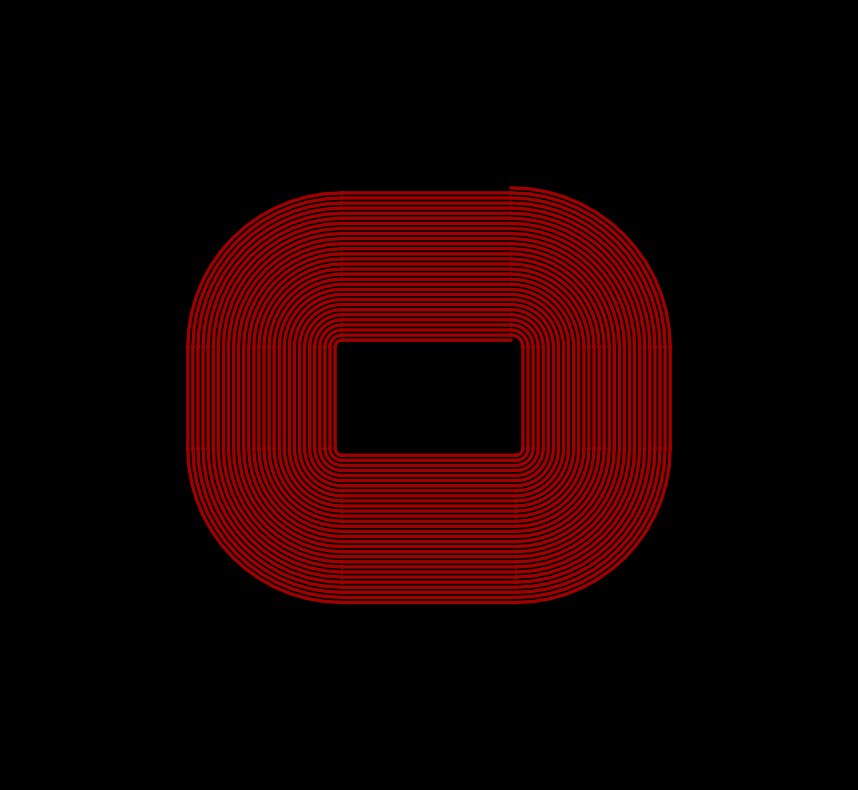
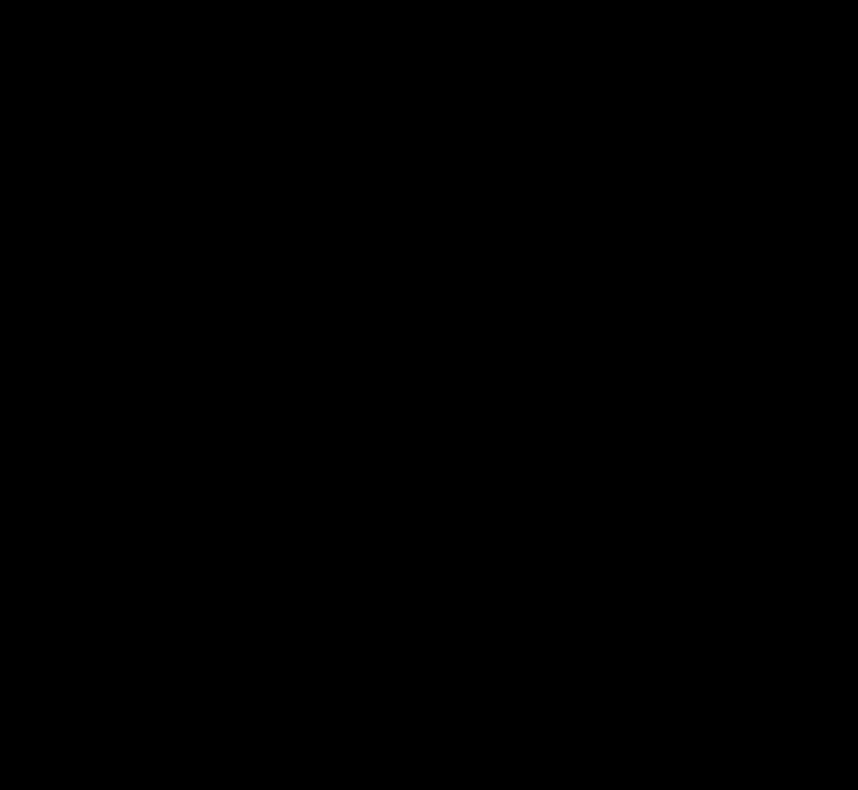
top track: (511, 187) (546, 191) (580, 203) (595, 212) (610, 222) (635, 247) (645, 262) (661, 294) (666, 311) (670, 346) (669, 465) (661, 499) (646, 530) (636, 544) (612, 568) (598, 578) (582, 587) (550, 598) (516, 602) (341, 602) (307, 598) (275, 587) (245, 568) (221, 544) (211, 530) (196, 499) (188, 465) (188, 329) (191, 312) (203, 280) (221, 250) (232, 238) (245, 226) (275, 208) (307, 196) (324, 193) (528, 193) (545, 196) (577, 208) (593, 216) (619, 238) (641, 264) (649, 280) (661, 312) (665, 346) (665, 448) (661, 481) (650, 513) (642, 527) (621, 553) (595, 574) (565, 589) (532, 596) (341, 597) (308, 593) (292, 589) (262, 574) (236, 553) (215, 527) (201, 497) (193, 465) (192, 448) (192, 346) (196, 313) (201, 297) (215, 267) (225, 254) (248, 230) (277, 212) (292, 206) (325, 198) (511, 197) (544, 201) (575, 212) (603, 230) (616, 241) (637, 267) (645, 282) (651, 297) (659, 330) (660, 448) (656, 480) (651, 495) (637, 524) (617, 550) (592, 570) (578, 578) (548, 588) (516, 592) (341, 592) (309, 588) (294, 584) (265, 570) (240, 550) (220, 524) (206, 495) (201, 480) (197, 448) (197, 346) (201, 314) (206, 299) (220, 270) (240, 245) (252, 234) (265, 225) (294, 211) (325, 203) (511, 203) (543, 206) (573, 217) (587, 225) (600, 234) (623, 257) (640, 284) (646, 299) (654, 330) (654, 448) (654, 463) (647, 494) (641, 508) (624, 534) (602, 556) (576, 573) (547, 583) (516, 587) (341, 587) (310, 583) (295, 579) (267, 565) (243, 546) (224, 522) (210, 494) (206, 479) (203, 448) (203, 346) (206, 316) (210, 301) (224, 273) (233, 260) (255, 238) (281, 221) (310, 211) (326, 209) (511, 208) (541, 211) (556, 215) (584, 229) (597, 238) (619, 260) (636, 286) (642, 301) (648, 331) (649, 448) (645, 483) (631, 515) (610, 542) (583, 564) (567, 571) (533, 581) (516, 582) (341, 582) (307, 577) (274, 564) (247, 542) (226, 515) (212, 483) (208, 448) (209, 329) (212, 312) (226, 280) (247, 252) (260, 240) (290, 223) (324, 214) (511, 213) (540, 216) (569, 226) (582, 233) (605, 252) (615, 263) (624, 275) (637, 302) (643, 331) (644, 448) (640, 481) (634, 497) (618, 526) (594, 550) (565, 567) (532, 575) (516, 577) (341, 577) (308, 572) (277, 559) (250, 539) (230, 512) (217, 481) (213, 448) (214, 330) (223, 297) (230, 282) (250, 255) (263, 244) (292, 228) (325, 219) (511, 218) (539, 221) (553, 225) (579, 238) (602, 255) (611, 266) (626, 291) (636, 318) (638, 332) (639, 448) (635, 480) (623, 510) (603, 535) (591, 546) (563, 562) (548, 567) (516, 572) (341, 572) (309, 567) (280, 555) (254, 535) (234, 510) (222, 480) (218, 448) (219, 330) (227, 299) (234, 285) (243, 271) (266, 248) (294, 232) (325, 224) (511, 223) (538, 226) (551, 230) (576, 242) (598, 259) (607, 269) (615, 281) (627, 306) (633, 333) (634, 448) (630, 479) (618, 507) (599, 532) (588, 542) (561, 557) (546, 562) (516, 566) (341, 566) (311, 562) (282, 551) (258, 532) (239, 507) (227, 479) (223, 448) (224, 331) (227, 316) (239, 287) (258, 263) (269, 252) (296, 237) (326, 229) (511, 228) (537, 231) (562, 240) (594, 263) (617, 295) (628, 333) (629, 448) (625, 477) (620, 491) (606, 517) (585, 538) (559, 553) (545, 557) (516, 561) (341, 561) (312, 557) (285, 546) (261, 528) (243, 505) (232, 477) (228, 448) (229, 332) (237, 303) (243, 290) (251, 277) (272, 256) (298, 242) (327, 234) (525, 234) (540, 237) (567, 248) (591, 266) (609, 290) (620, 317) (623, 332) (624, 448) (620, 476) (609, 502) (602, 514) (582, 534) (570, 542) (544, 553) (516, 556) (327, 555) (300, 548) (275, 534) (255, 514) (248, 502) (237, 476) (233, 448) (234, 332) (237, 318) (248, 292) (255, 280) (275, 260) (300, 246) (327, 239) (511, 238) (535, 241) (568, 255) (587, 270) (608, 299) (618, 334) (619, 448) (615, 475) (611, 487) (598, 511) (589, 521) (567, 537) (542, 548) (516, 551) (328, 550) (315, 548) (290, 537) (268, 521) (252, 500) (242, 475) (238, 448) (239, 333) (242, 320) (252, 295) (268, 273) (278, 265) (302, 251) (328, 244) (511, 243) (534, 246) (565, 259) (591, 282) (604, 302) (613, 335) (614, 448) (610, 473) (601, 497) (594, 508) (585, 517) (565, 533) (541, 543) (516, 546) (329, 545) (304, 539) (282, 526) (263, 508) (251, 486) (247, 473) (243, 448) (244, 334) (247, 321) (256, 297) (272, 277) (282, 269) (304, 256) (329, 249) (511, 248) (532, 251) (563, 263) (587, 285) (603, 314) (608, 335) (609, 448) (606, 472) (596, 494) (589, 505) (581, 514) (562, 529) (540, 538) (516, 541) (329, 540) (306, 534) (285, 522) (276, 514) (261, 494) (251, 472) (248, 448) (249, 334) (255, 311) (261, 300) (276, 281) (285, 273) (306, 260) (329, 254) (521, 254) (551, 263) (576, 281) (594, 306) (603, 336) (604, 448) (601, 471) (597, 482) (585, 502) (578, 510) (560, 524) (538, 533) (516, 536) (330, 535) (308, 529) (288, 518) (272, 502) (260, 482) (256, 471) (253, 448) (254, 335) (260, 313) (265, 302) (272, 293) (288, 277) (308, 265) (330, 259) (522, 259) (544, 265) (564, 277) (573, 284) (587, 302) (596, 324) (598, 335) (599, 448) (596, 469) (581, 498) (557, 520) (537, 528) (516, 531) (331, 530) (310, 525) (291, 514) (276, 498) (261, 469) (258, 448) (259, 336) (270, 305) (291, 281) (310, 270) (331, 264) (520, 264) (547, 272) (569, 288) (585, 310) (593, 337) (594, 448) (591, 468) (577, 495) (555, 515) (536, 523) (516, 526) (331, 525) (312, 520) (294, 510) (274, 487) (266, 468) (263, 448) (264, 336) (274, 307) (294, 285) (312, 274) (331, 269) (519, 269) (544, 276) (566, 291) (581, 313) (588, 338) (588, 448) (586, 467) (573, 492) (552, 511) (534, 518) (516, 521) (332, 520) (313, 515) (290, 499) (278, 484) (271, 467) (269, 448) (269, 337) (278, 310) (297, 289) (313, 279) (332, 274) (519, 274) (542, 281) (562, 295) (576, 315) (583, 338) (583, 457) (578, 474) (569, 489) (549, 507) (533, 513) (516, 516) (332, 515) (315, 510) (300, 502) (283, 482) (276, 465) (274, 448) (274, 338) (283, 313) (300, 293) (315, 284) (341, 279) (518, 279) (540, 285) (558, 299) (572, 317) (578, 339) (578, 456) (570, 479) (560, 492) (547, 502) (532, 508) (516, 511) (333, 510) (310, 502) (297, 492) (287, 479) (281, 464) (279, 448) (279, 338) (287, 315) (303, 297) (325, 286) (341, 284) (519, 284) (535, 289) (555, 302) (568, 322) (573, 338) (573, 455) (565, 477) (556, 489) (544, 498) (531, 504) (516, 505) (334, 505) (319, 501) (306, 494) (292, 477) (286, 463) (284, 448) (284, 339) (292, 318) (306, 301) (319, 293) (341, 289) (517, 289) (536, 295) (551, 306) (562, 321) (568, 340) (568, 455) (564, 468) (557, 480) (542, 493) (529, 499) (516, 500) (334, 500) (321, 496) (309, 490) (296, 474) (291, 462) (289, 448) (289, 340) (296, 320) (309, 305) (321, 298) (341, 294) (516, 294) (533, 299) (548, 309) (558, 324) (563, 341) (563, 453) (556, 473) (541, 488) (526, 494) (516, 495) (335, 495) (323, 492) (312, 486) (304, 477) (296, 460) (294, 341) (299, 326) (312, 309) (326, 302) (341, 299) (516, 299) (531, 304) (544, 313) (553, 326) (558, 341) (558, 453) (551, 470) (538, 484) (530, 488) (516, 490) (336, 490) (320, 485) (311, 478) (305, 469) (299, 453) (299, 342) (306, 324) (319, 311) (332, 305) (341, 304) (515, 304) (529, 308) (540, 316) (549, 328) (553, 342) (553, 452) (547, 468) (532, 482) (516, 485) (336, 485) (327, 482) (315, 474) (307, 462) (304, 453) (304, 342) (309, 328) (319, 317) (332, 310) (341, 309) (515, 309) (529, 314) (537, 320) (545, 332) (547, 342) (548, 452) (541, 468) (532, 476) (516, 480) (337, 480) (325, 476) (319, 471) (312, 460) (309, 452) (309, 343) (314, 329) (324, 319) (341, 314) (514, 314) (525, 317) (533, 324) (540, 332) (543, 343) (543, 451) (539, 462) (530, 471) (516, 475) (338, 475) (322, 467) (314, 451) (314, 343) (318, 332) (327, 323) (341, 319) (514, 320) (522, 322) (530, 327) (535, 335) (537, 343) (538, 450) (534, 460) (527, 467) (516, 470) (338, 470) (326, 464) (320, 451) (319, 344) (323, 335) (330, 328) (341, 324) (511, 324) (524, 329) (530, 337) (532, 344) (532, 450) (530, 457) (525, 462) (516, 465) (341, 465) (329, 460) (325, 450) (325, 345) (327, 337) (332, 332) (341, 329) (511, 329) (523, 334) (527, 345) (527, 448) (522, 458) (516, 460) (341, 460) (333, 456) (330, 450) (329, 346) (331, 340) (335, 336) (341, 335) (511, 335) (519, 338) (522, 345) (522, 448) (519, 454) (341, 455) (337, 453) (335, 449) (335, 346) (338, 341) (511, 340) -> none

